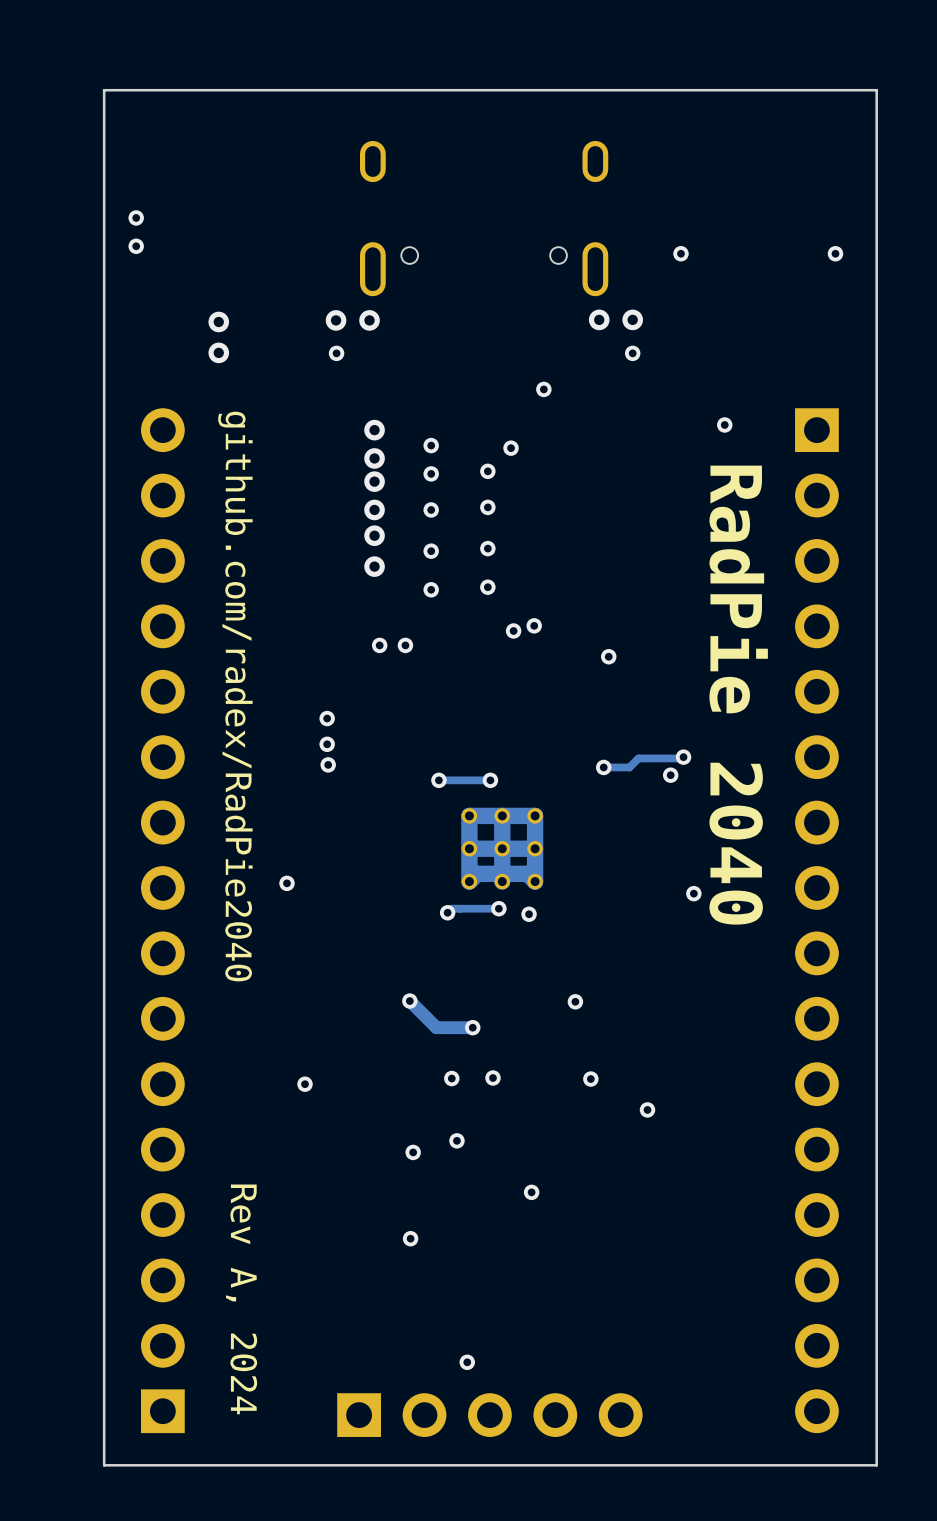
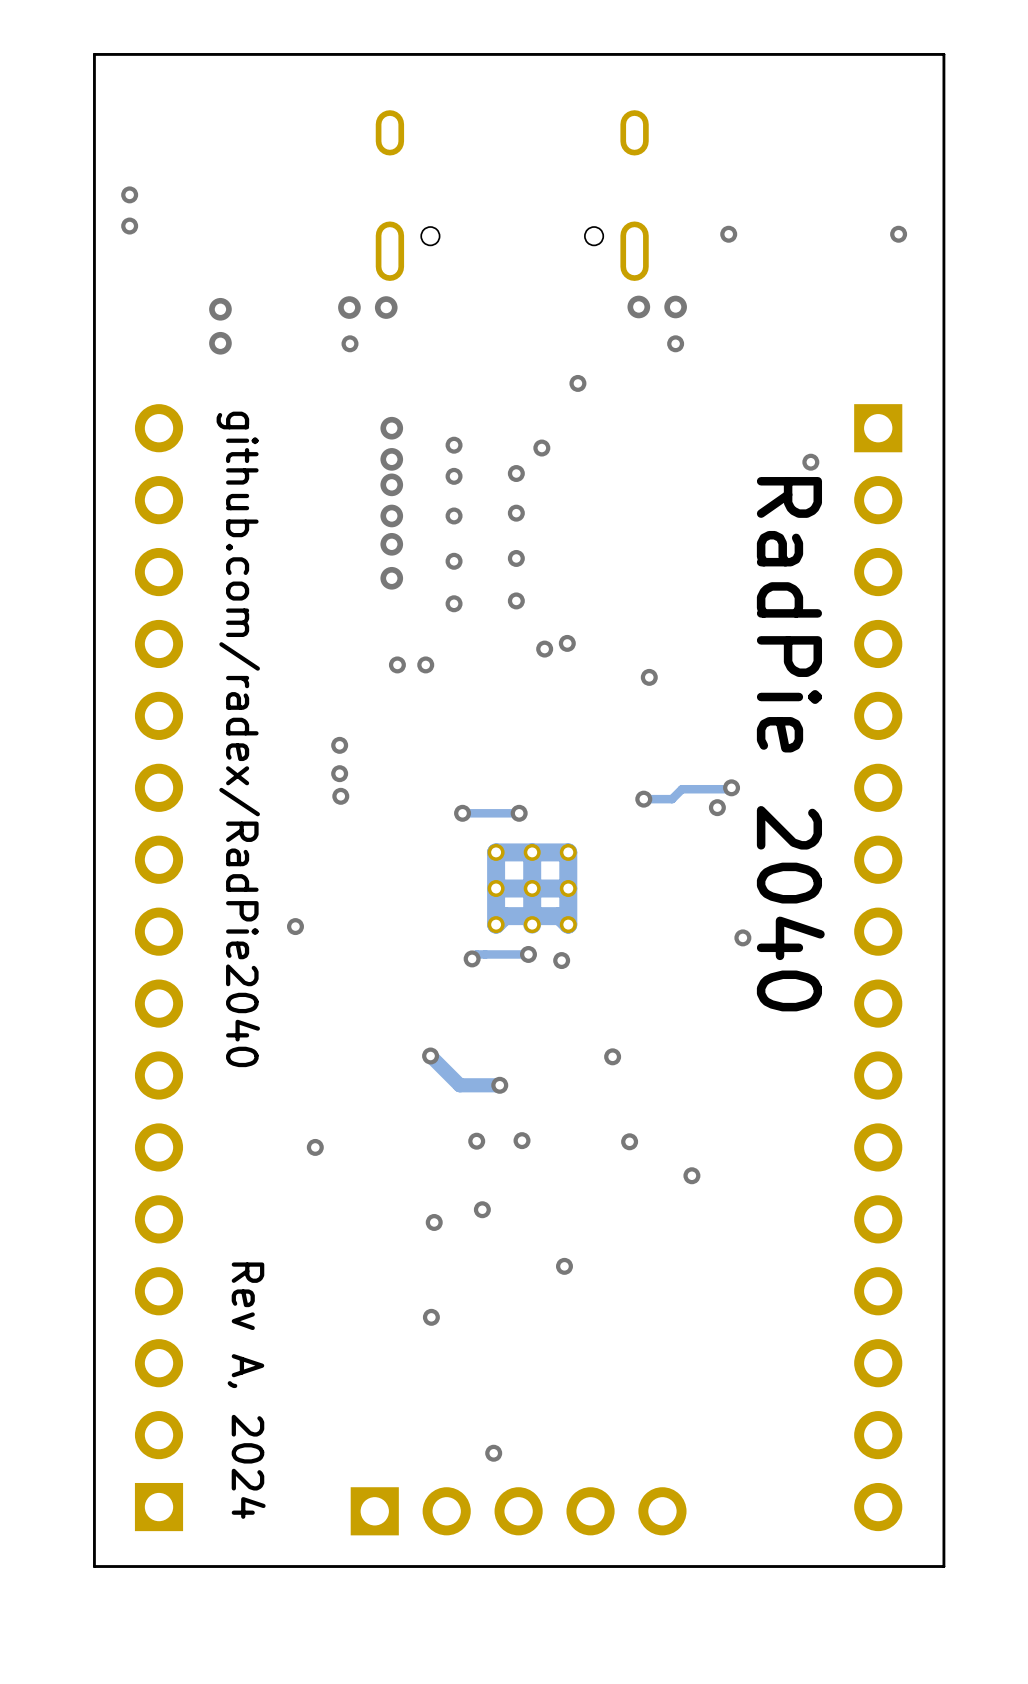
via position: (724, 424) -> (810, 462)

